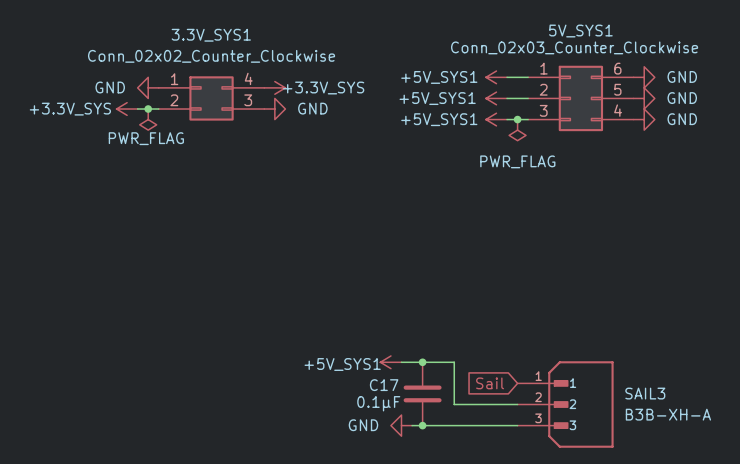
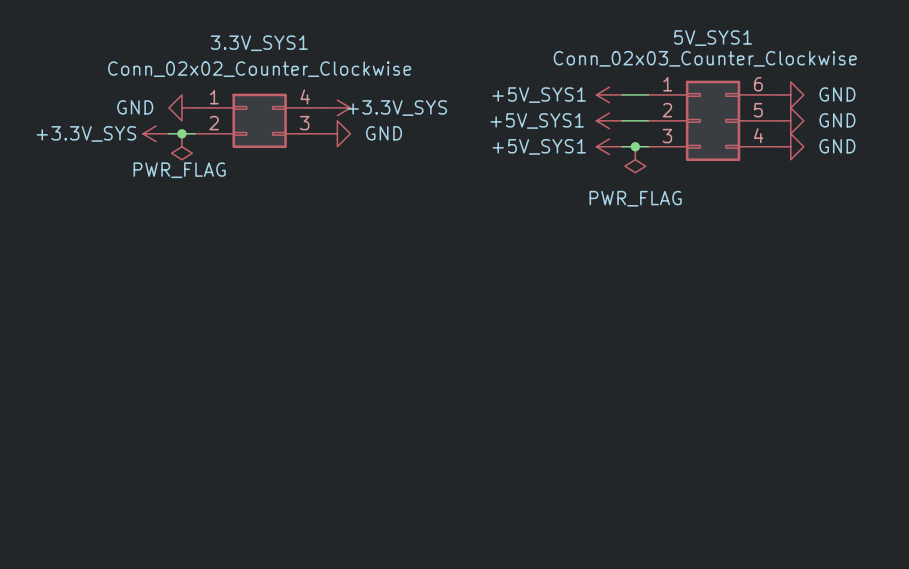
power symbol: +5V_SYS1 (390, 362) -> none
wire: (401, 362) (454, 362) (454, 404) (517, 404) -> none
junction: (422, 362) -> none
global label: Sail (490, 383) -> none
C17: 0.1µF (422, 393) -> none
SAIL3: B3B-XH-A (565, 404) -> none
power symbol: GND (401, 425) -> none
wire: (412, 425) (517, 425) -> none
junction: (422, 425) -> none

